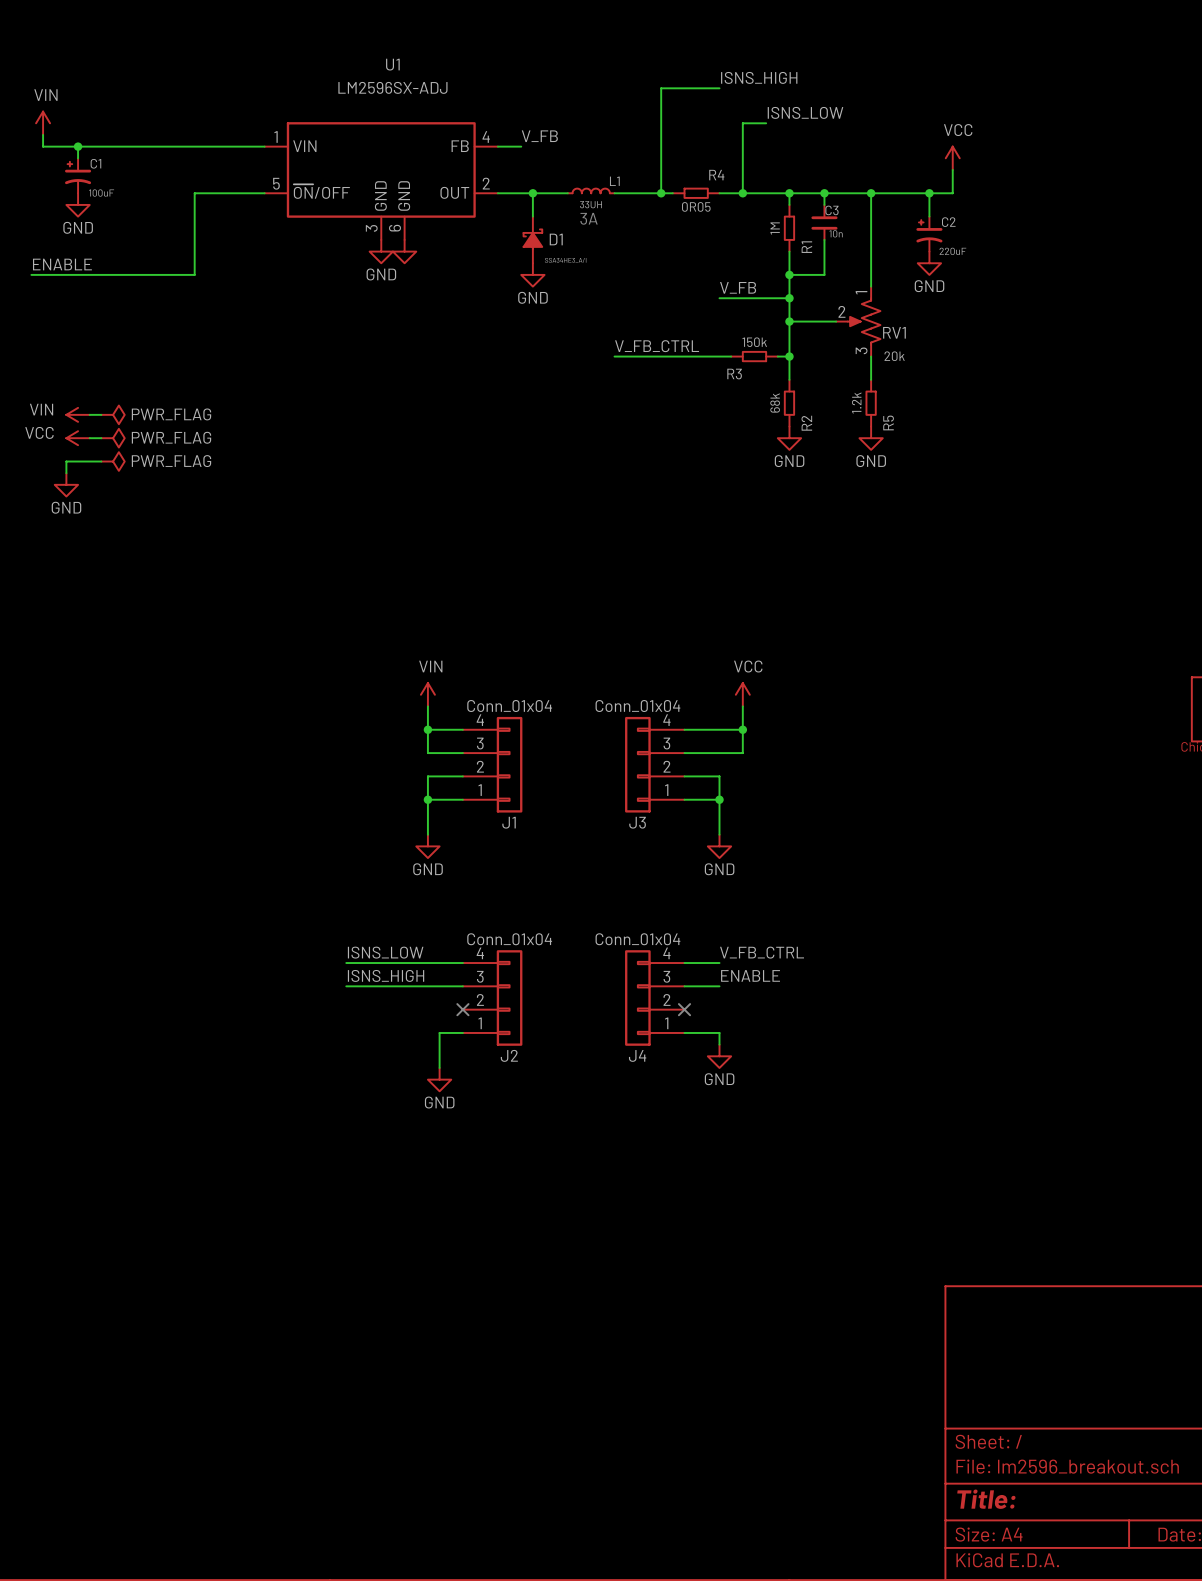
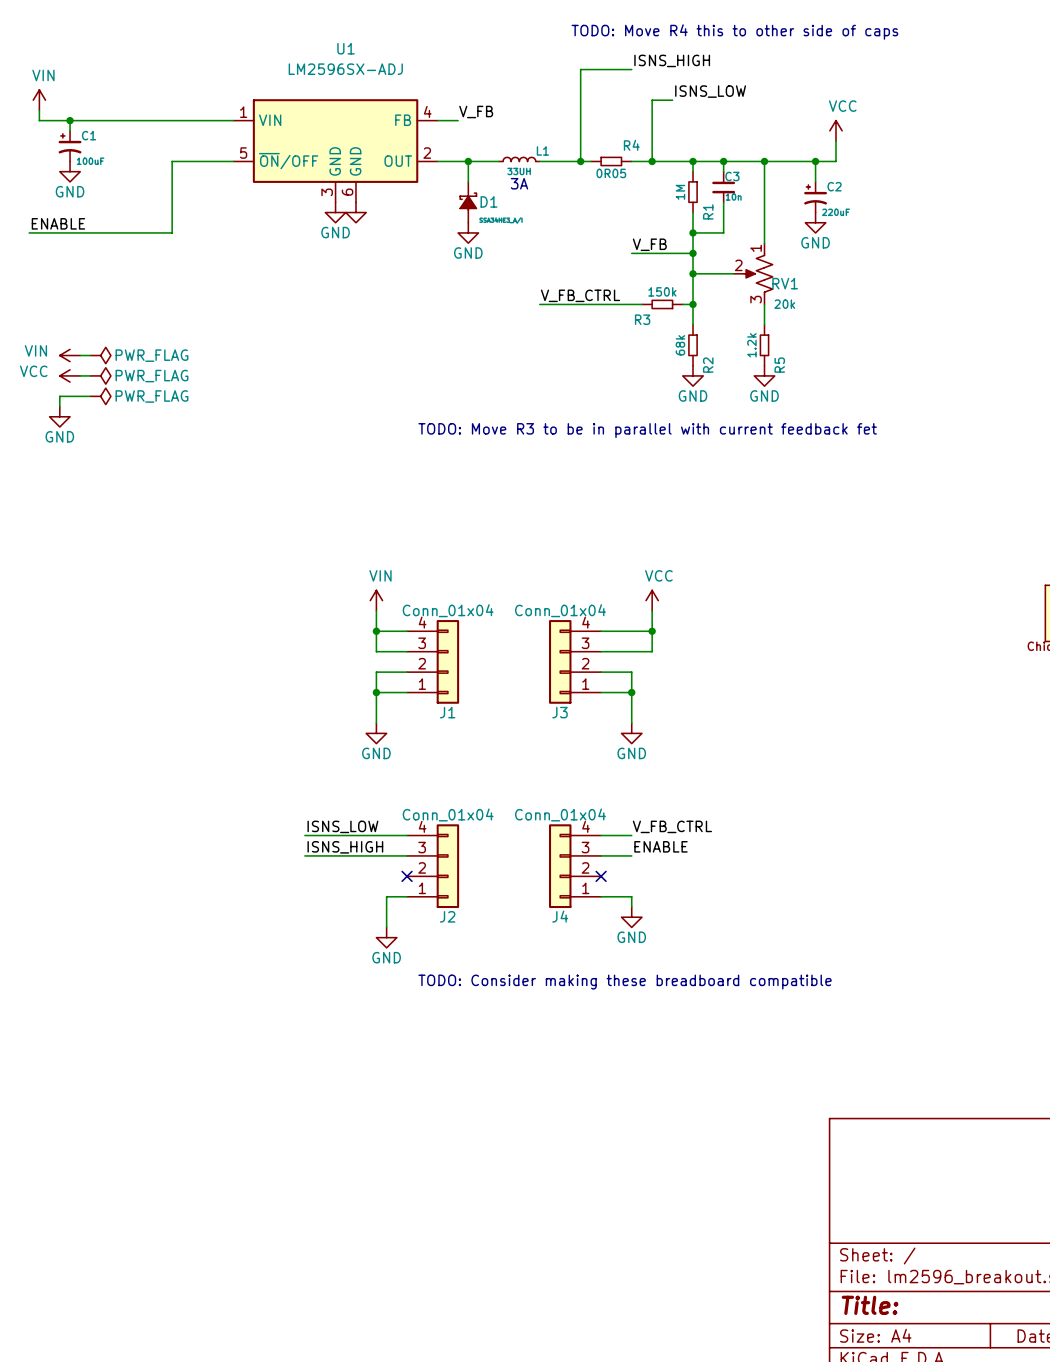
text: none -> TODO: Move R4 this to other side of caps (734, 32)
text: none -> TODO: Move R3 to be in parallel with current feedback fet (647, 430)
text: none -> TODO: Consider making these breadboard compatible (625, 982)

